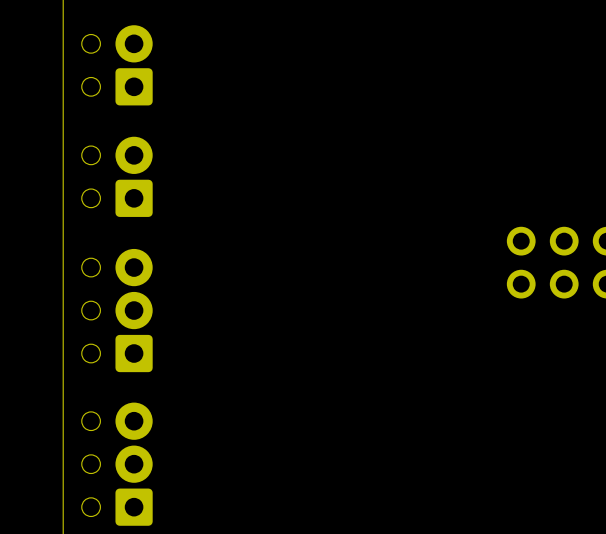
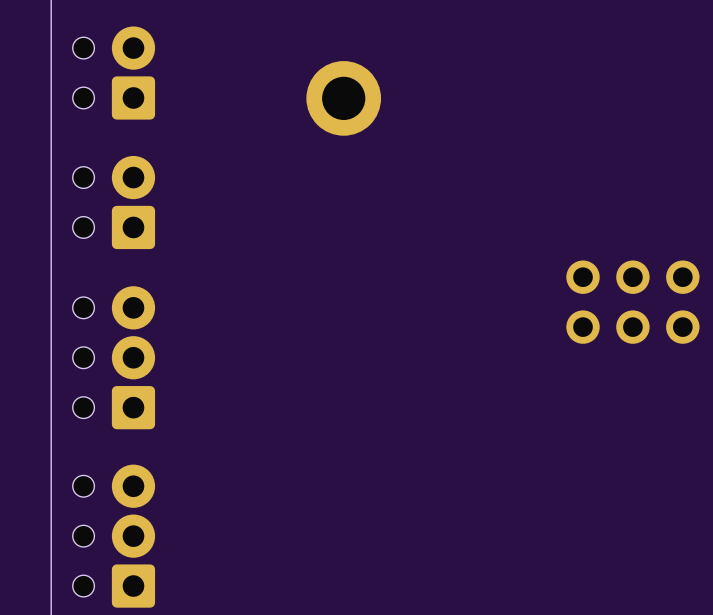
part: none -> (343, 98)

